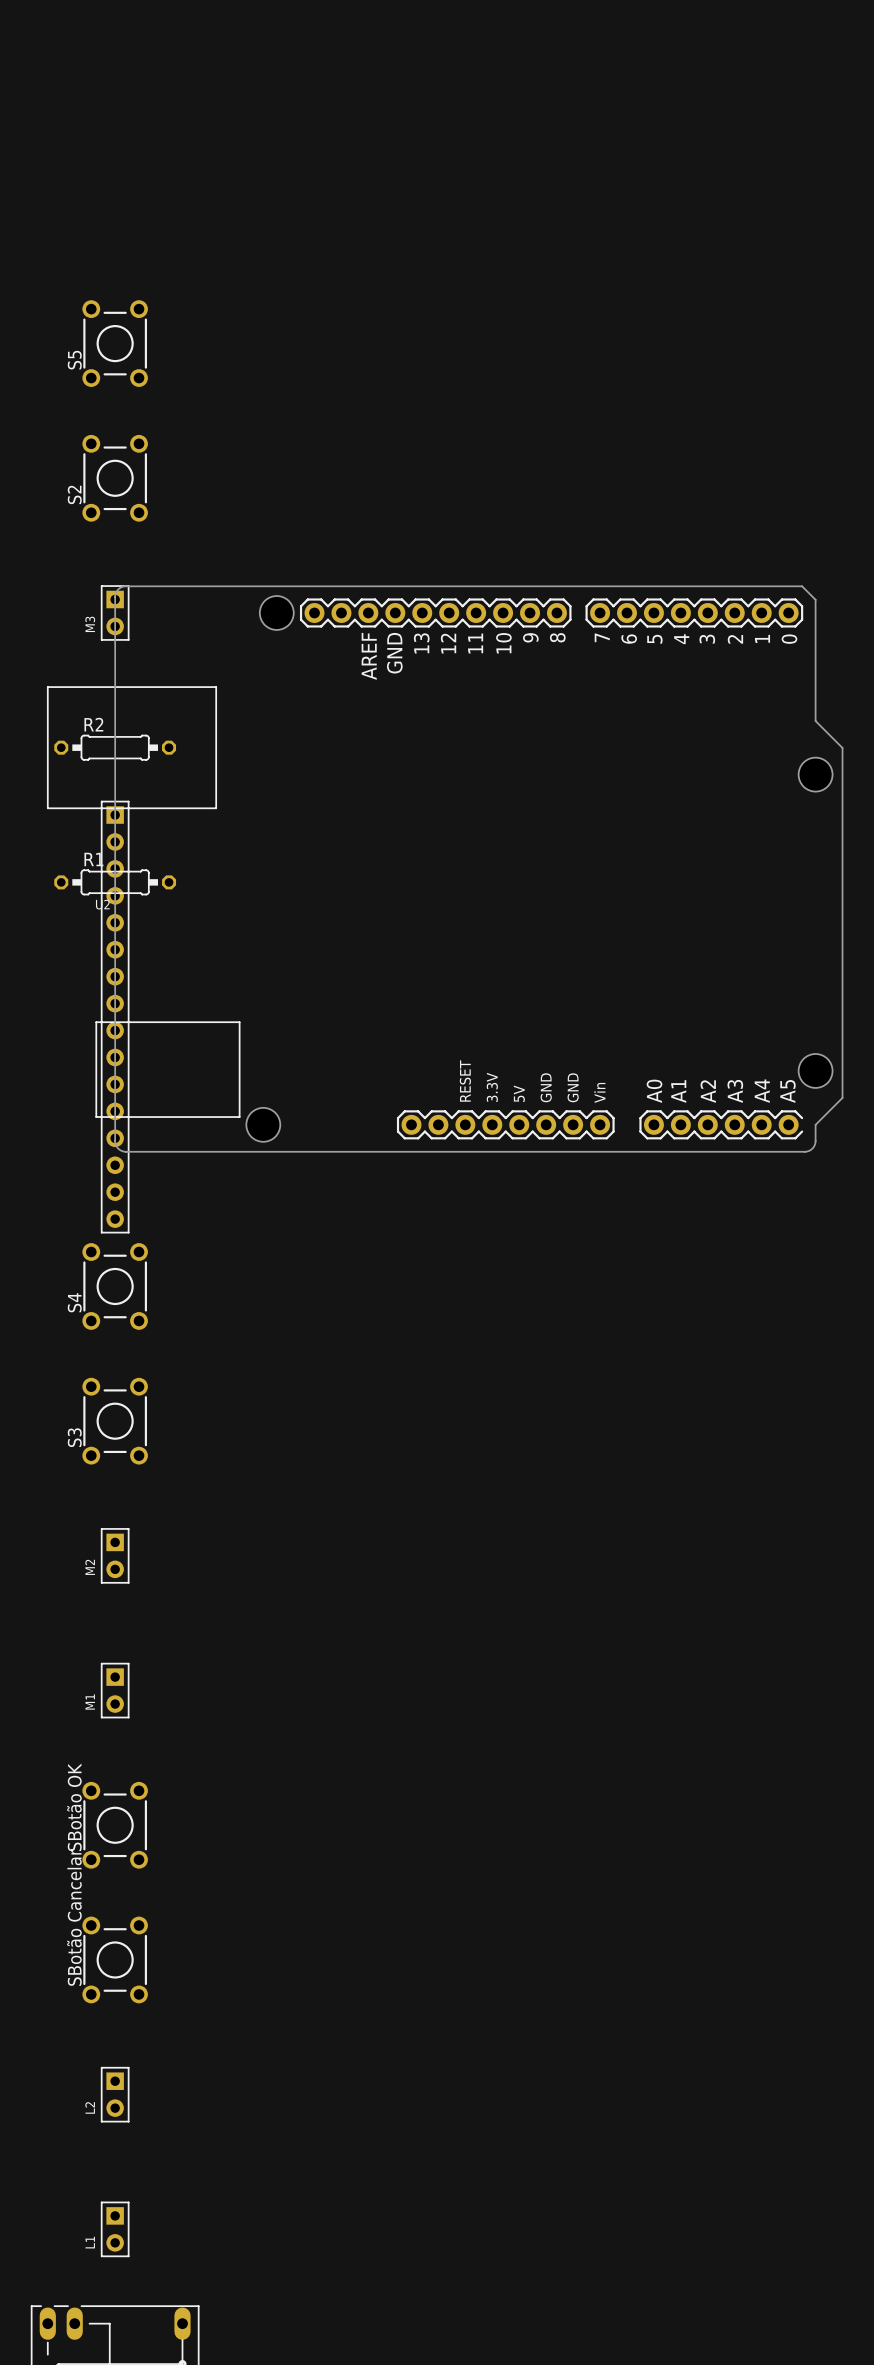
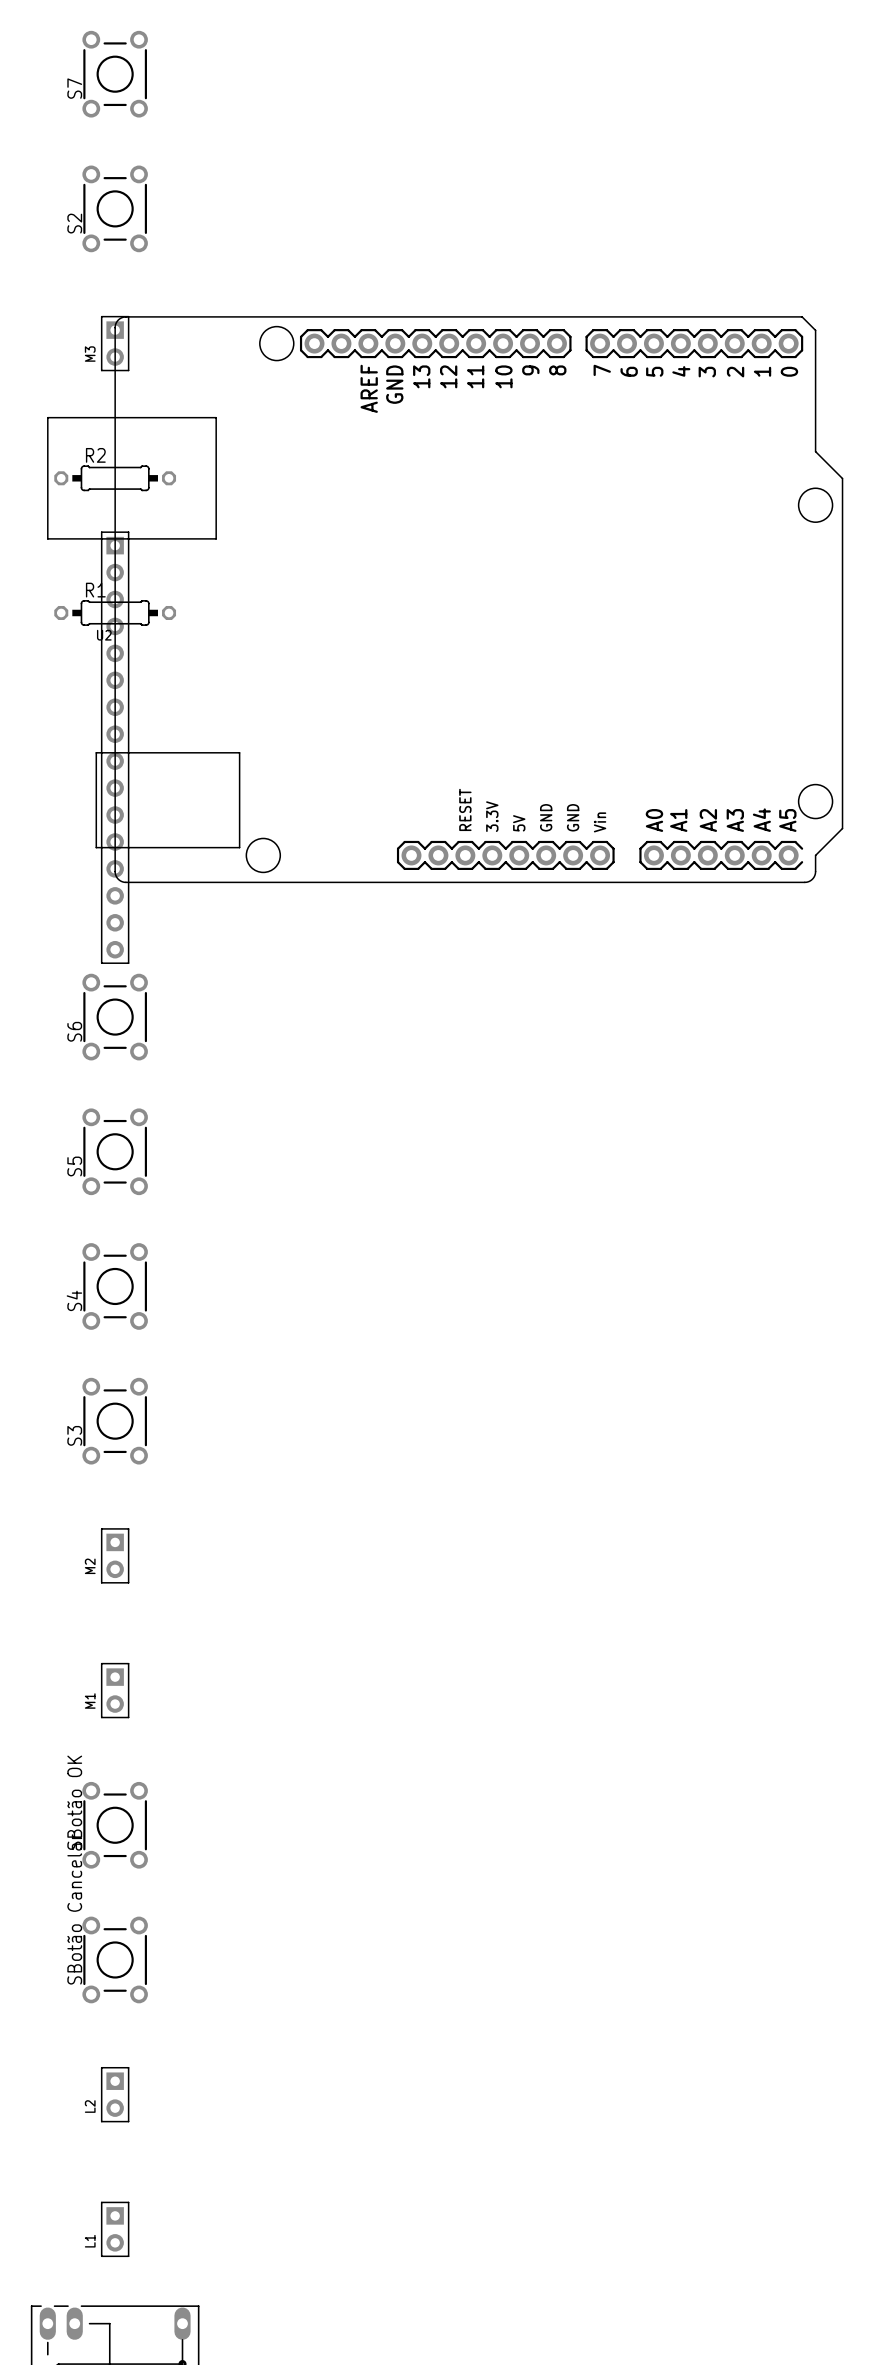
S7: none -> (115, 74)
S5 position: (115, 343) -> (115, 1151)
S2 position: (115, 478) -> (115, 208)
part: none -> (445, 599)
M3 position: (115, 612) -> (115, 343)
R2 position: (115, 747) -> (115, 478)
part: (445, 869) -> none
R1 position: (115, 882) -> (115, 612)
U2 position: (115, 1017) -> (115, 747)
S6: none -> (115, 1017)

